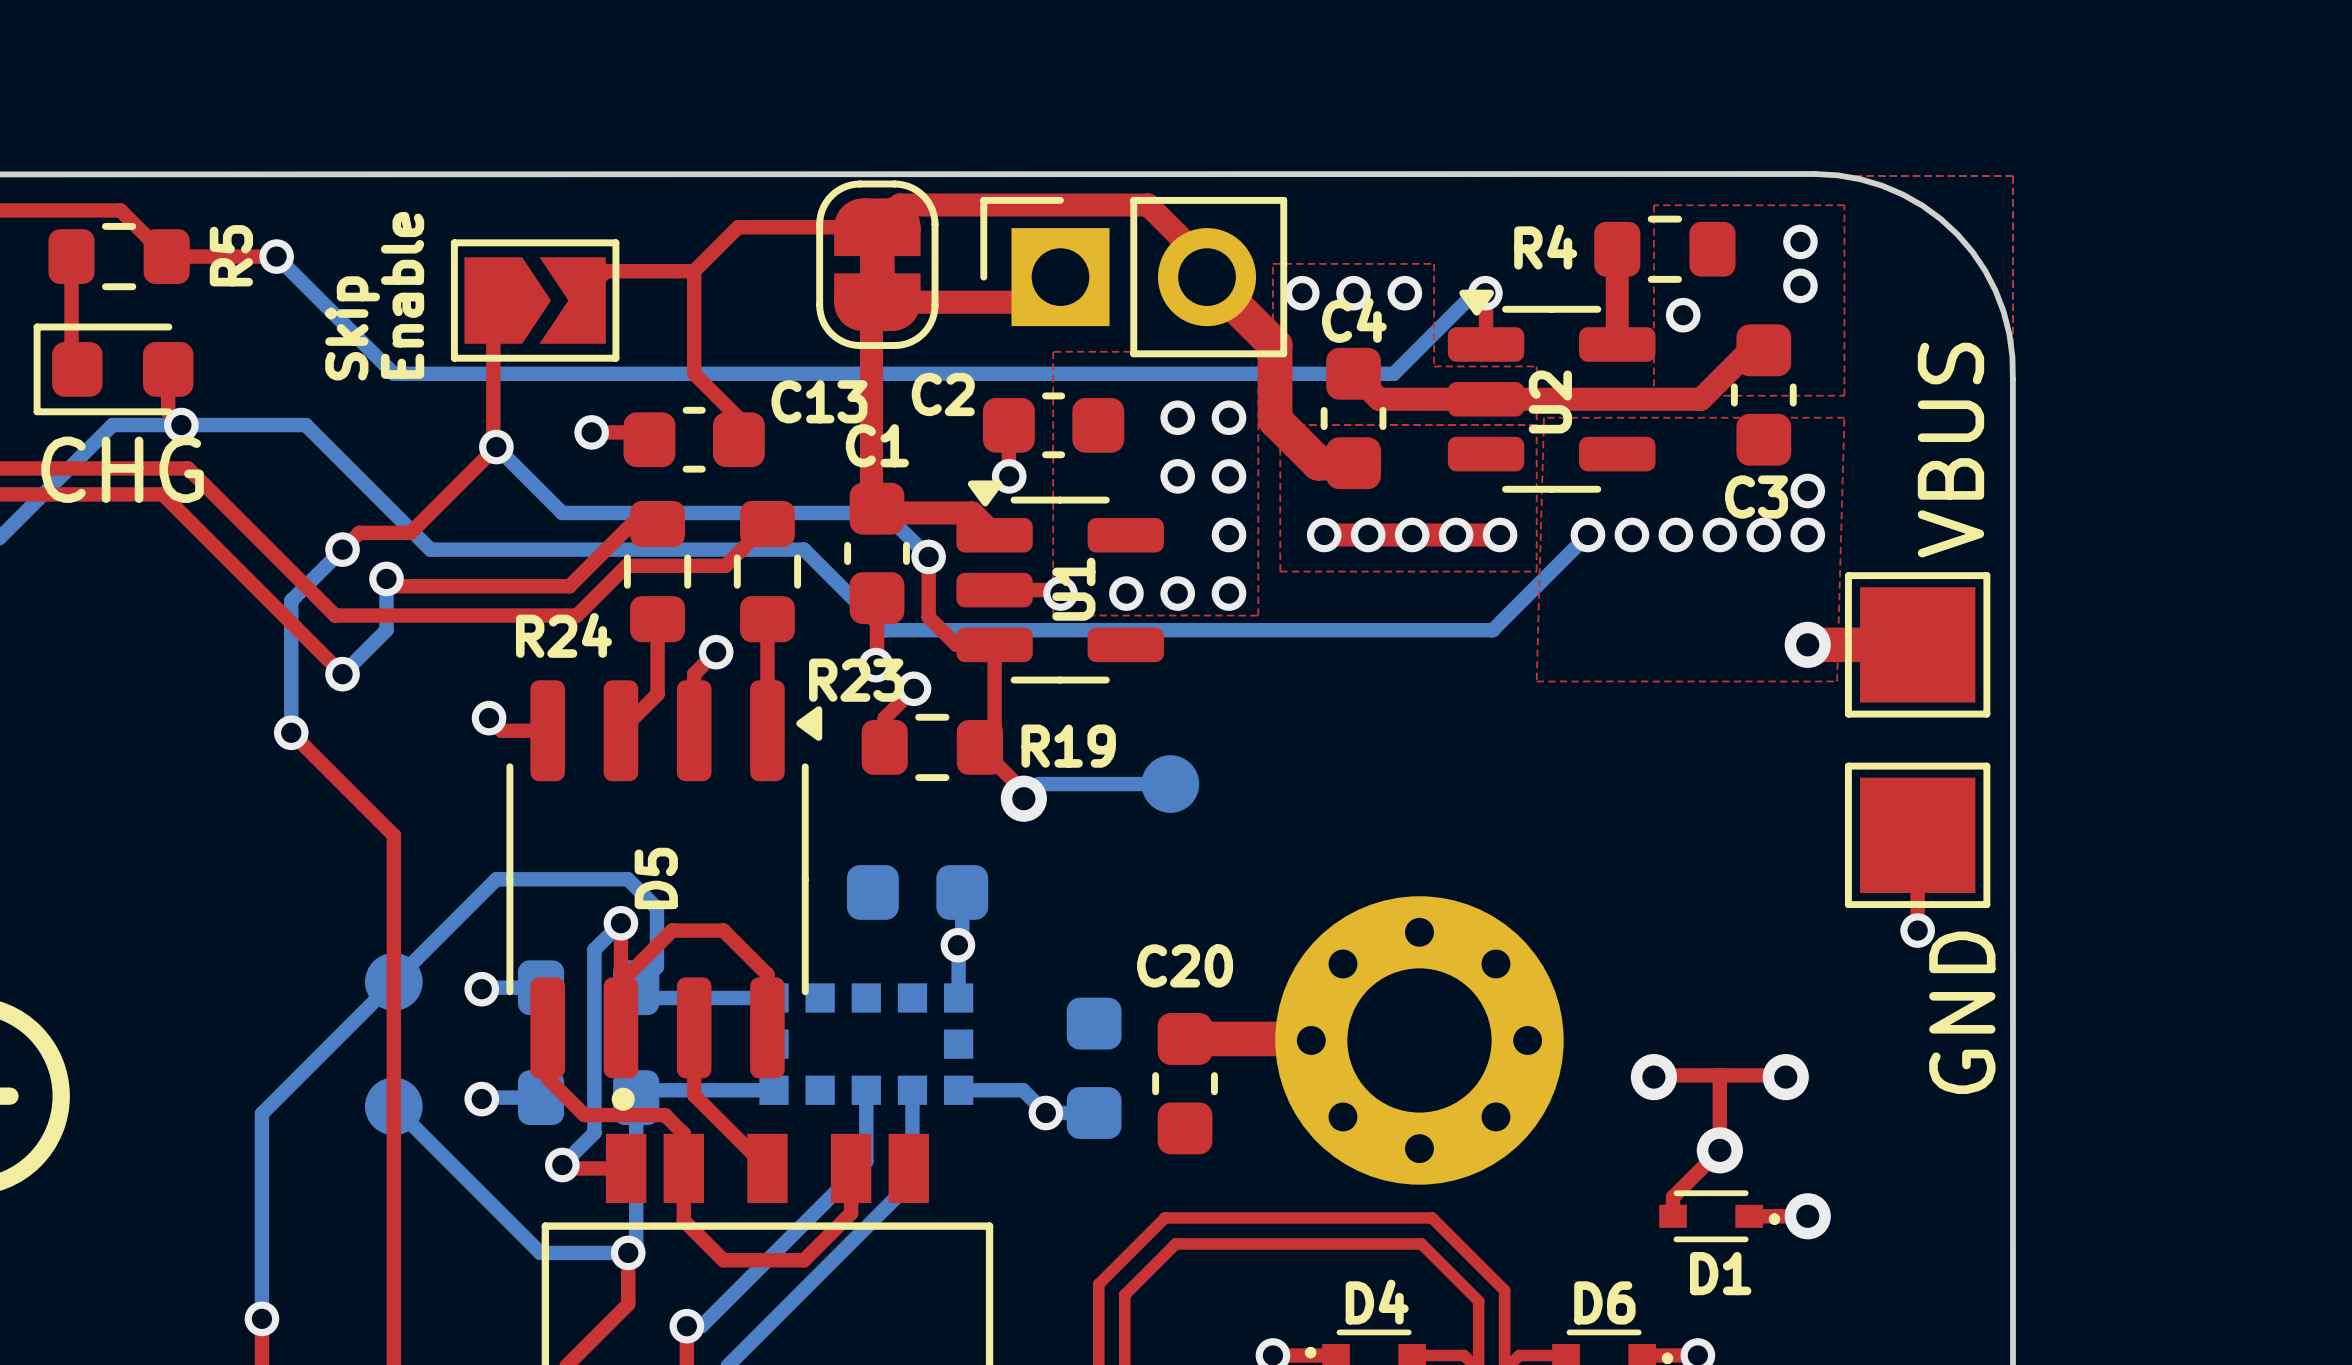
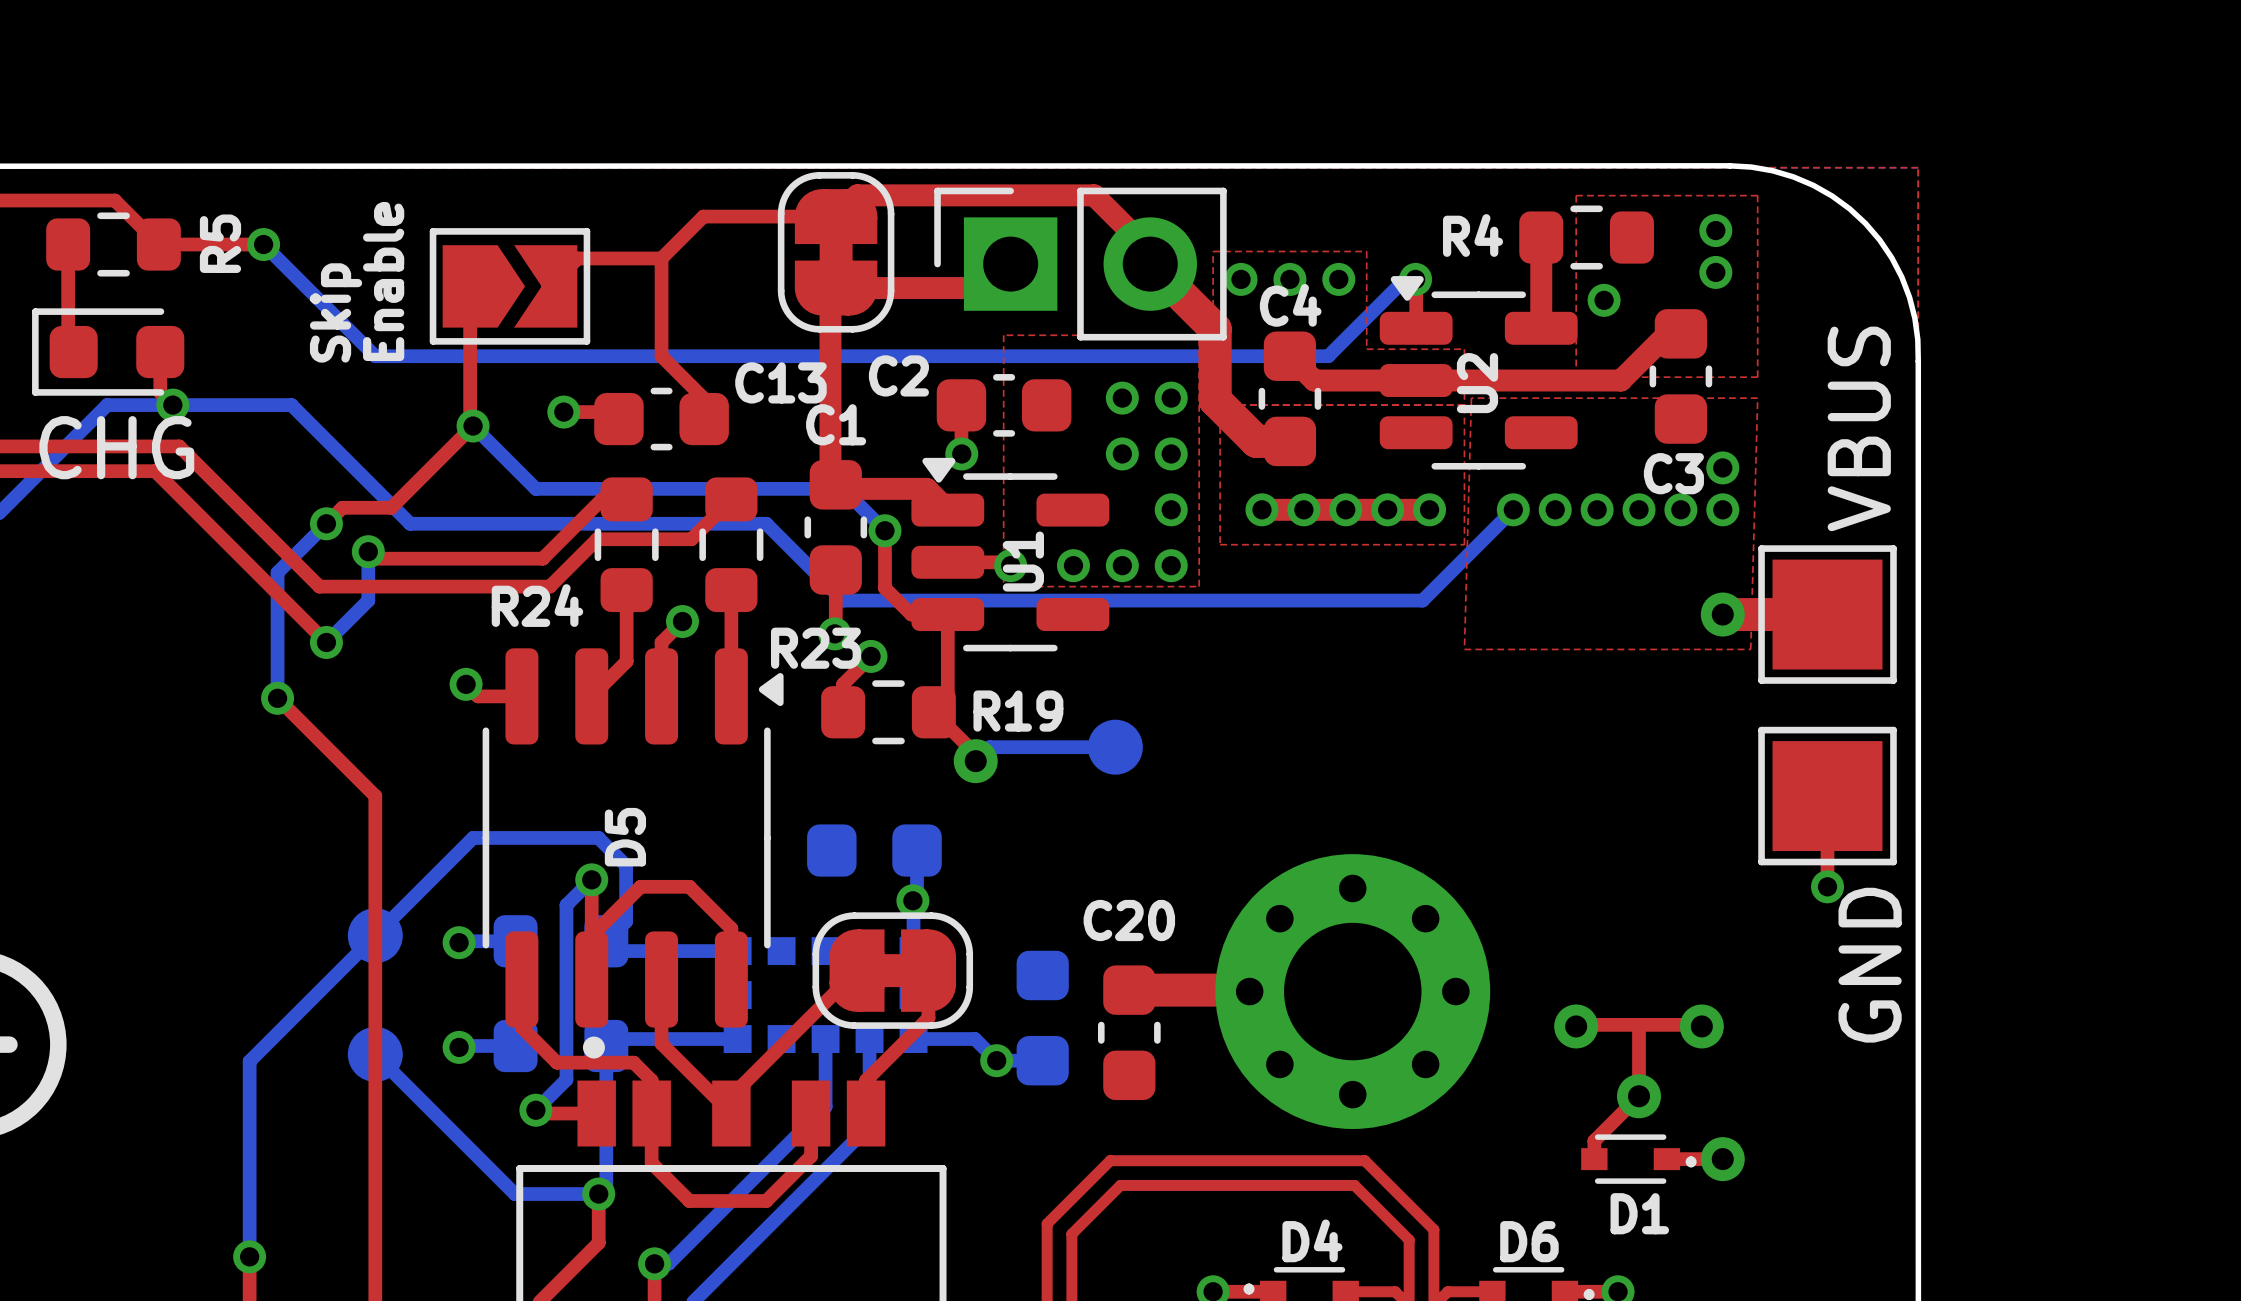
top track: none -> (857, 970) (731, 1096)
part: none -> (892, 970)
top track: none -> (928, 970) (928, 1018) (866, 1080) (866, 1113)

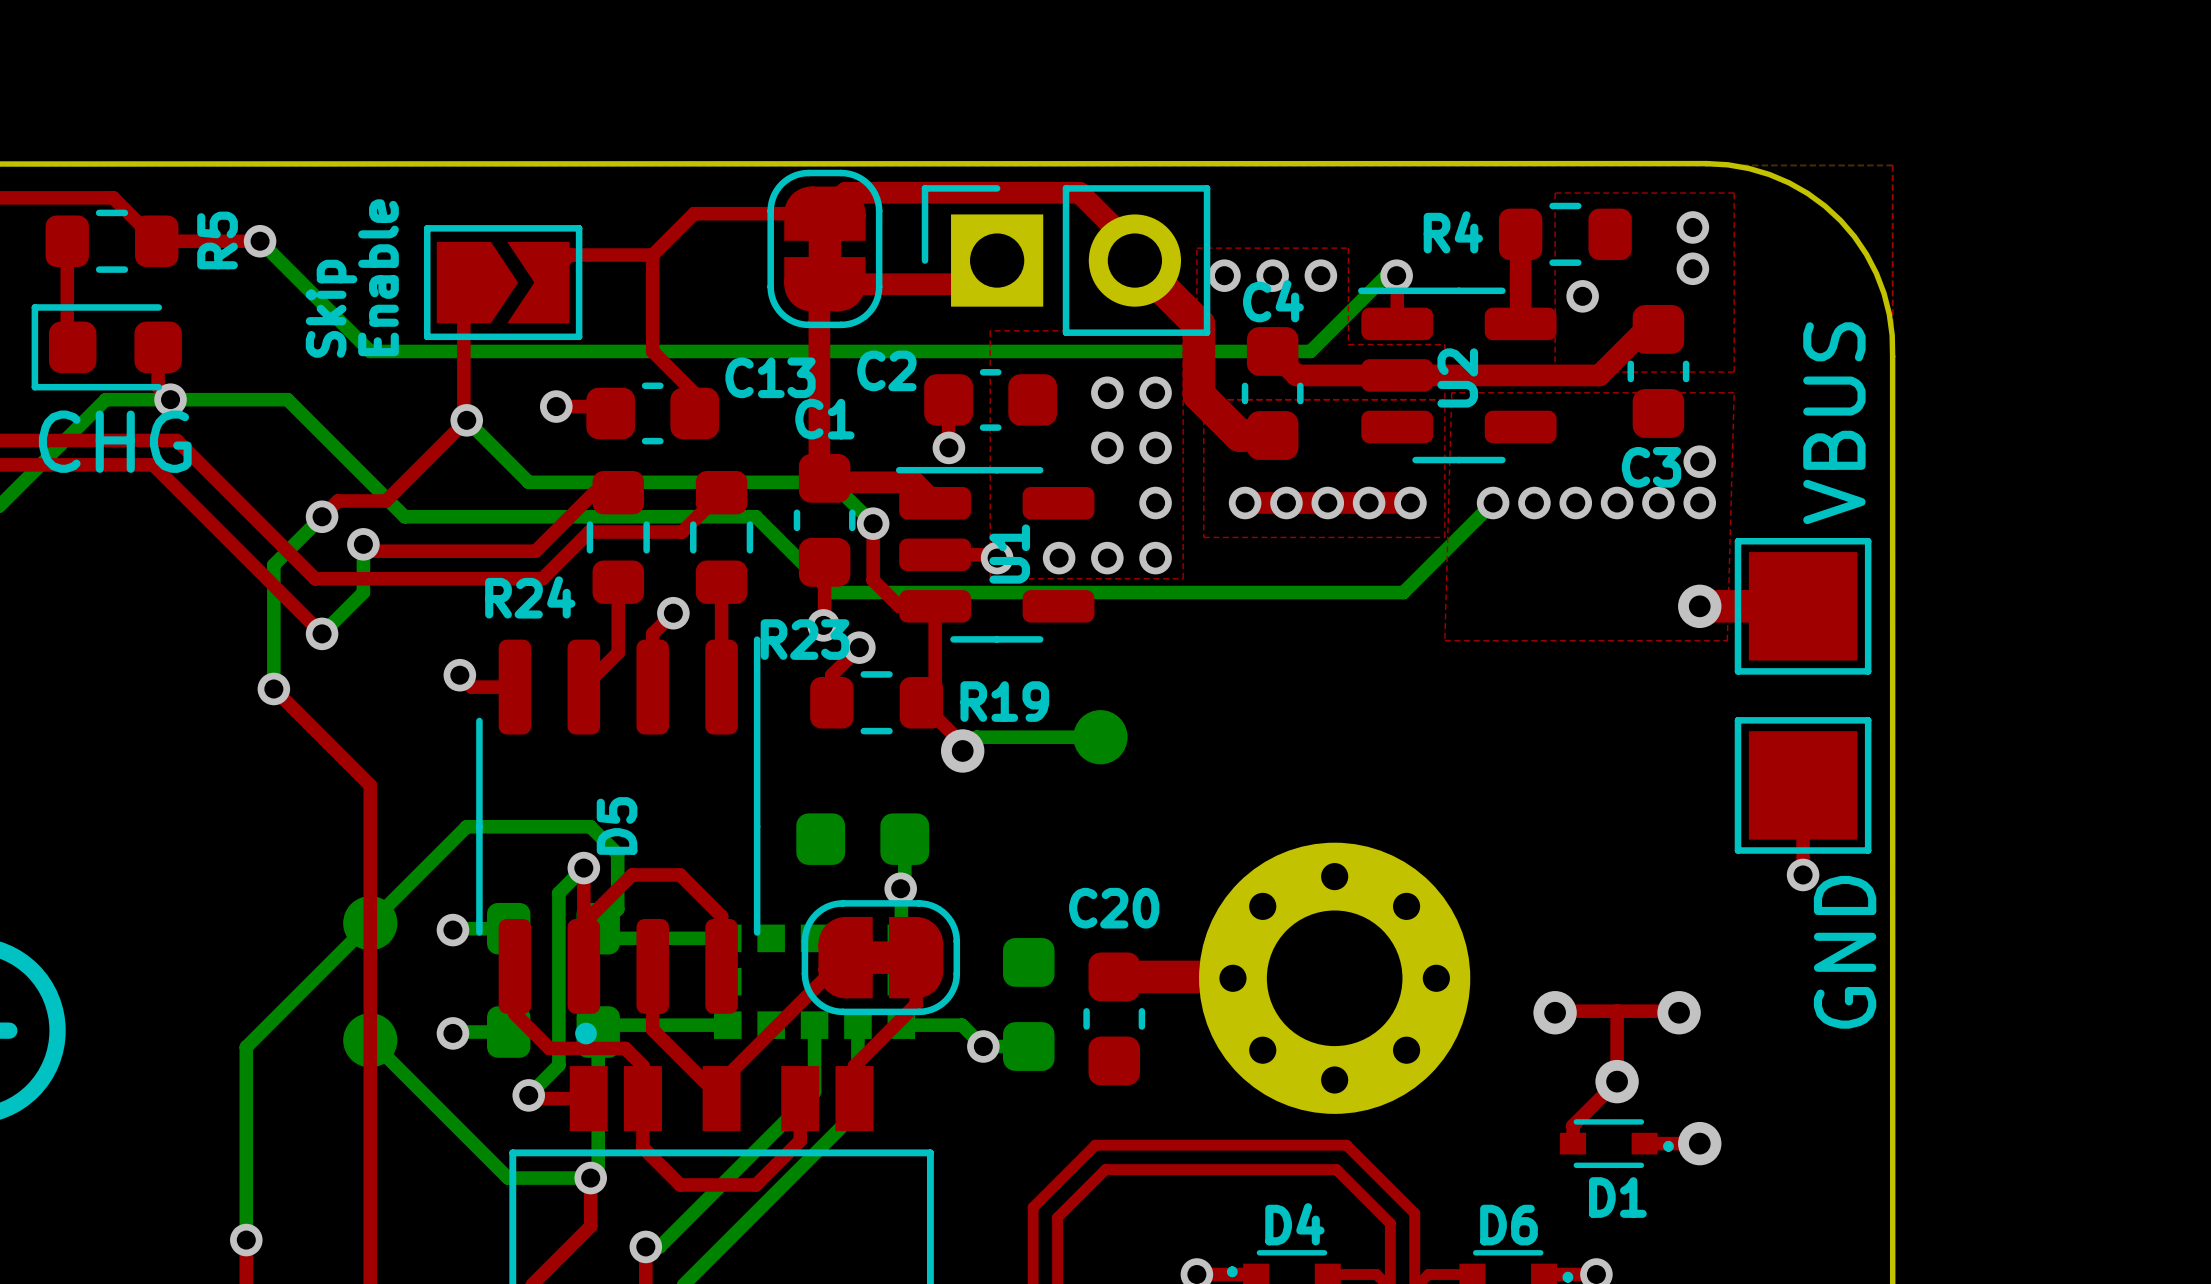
U2 footprint: [1379, 276, 1578, 470] -> [1358, 287, 1557, 464]
U1 footprint: [911, 457, 1110, 652] -> [895, 466, 1095, 643]
D5 footprint: [482, 648, 784, 1028] -> [476, 636, 761, 1014]

